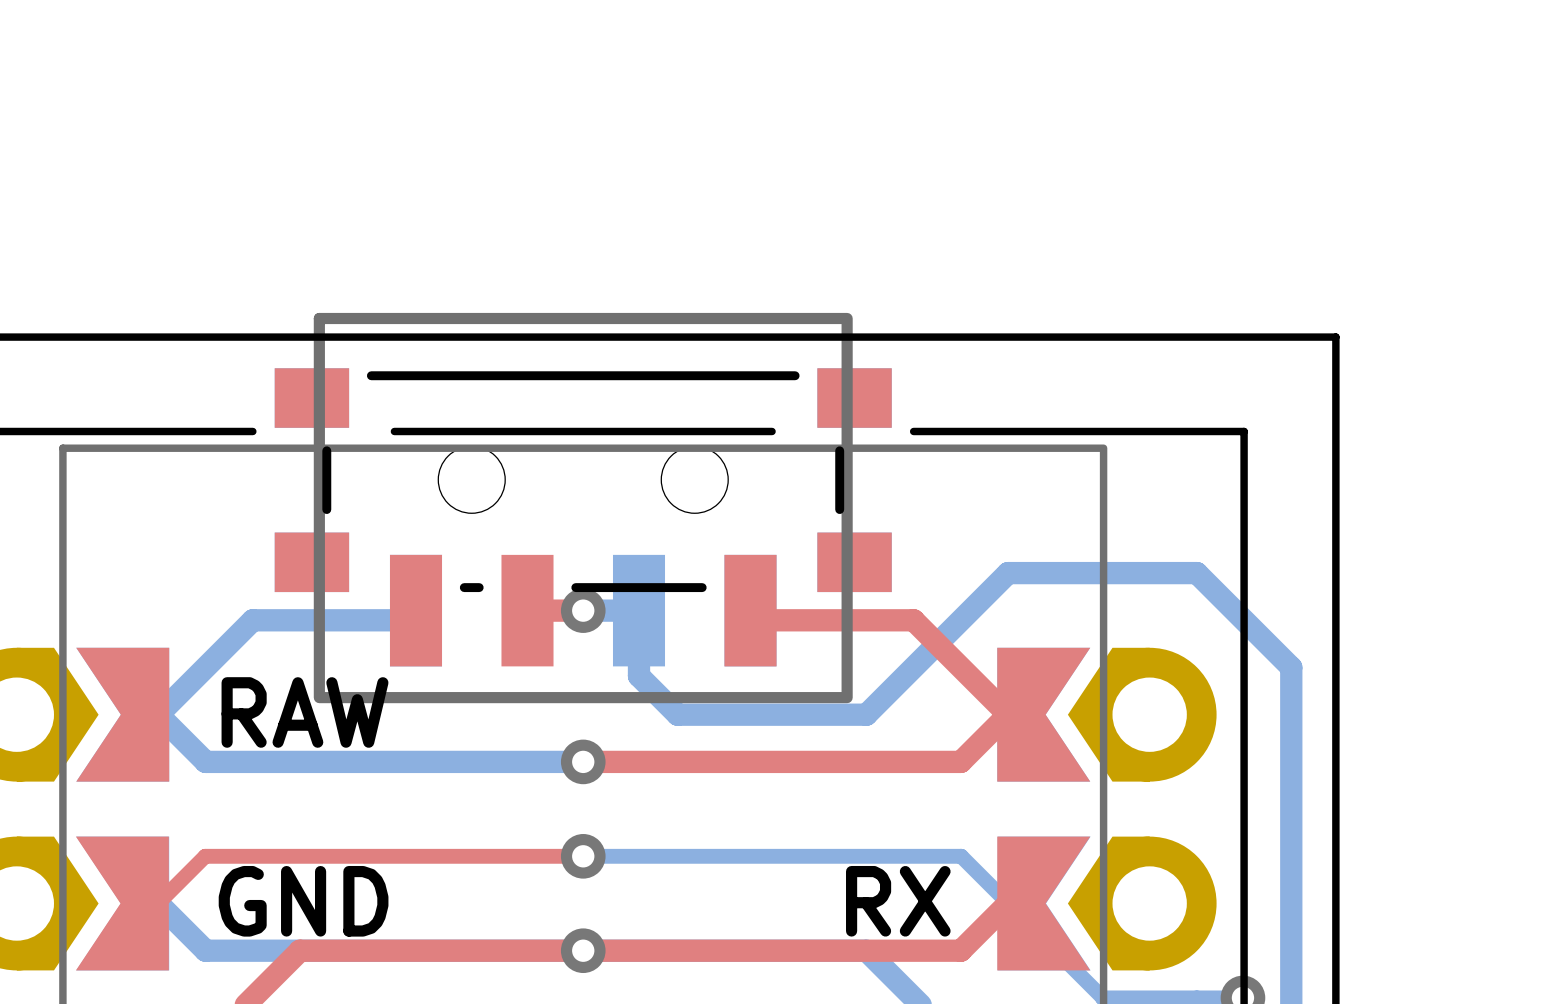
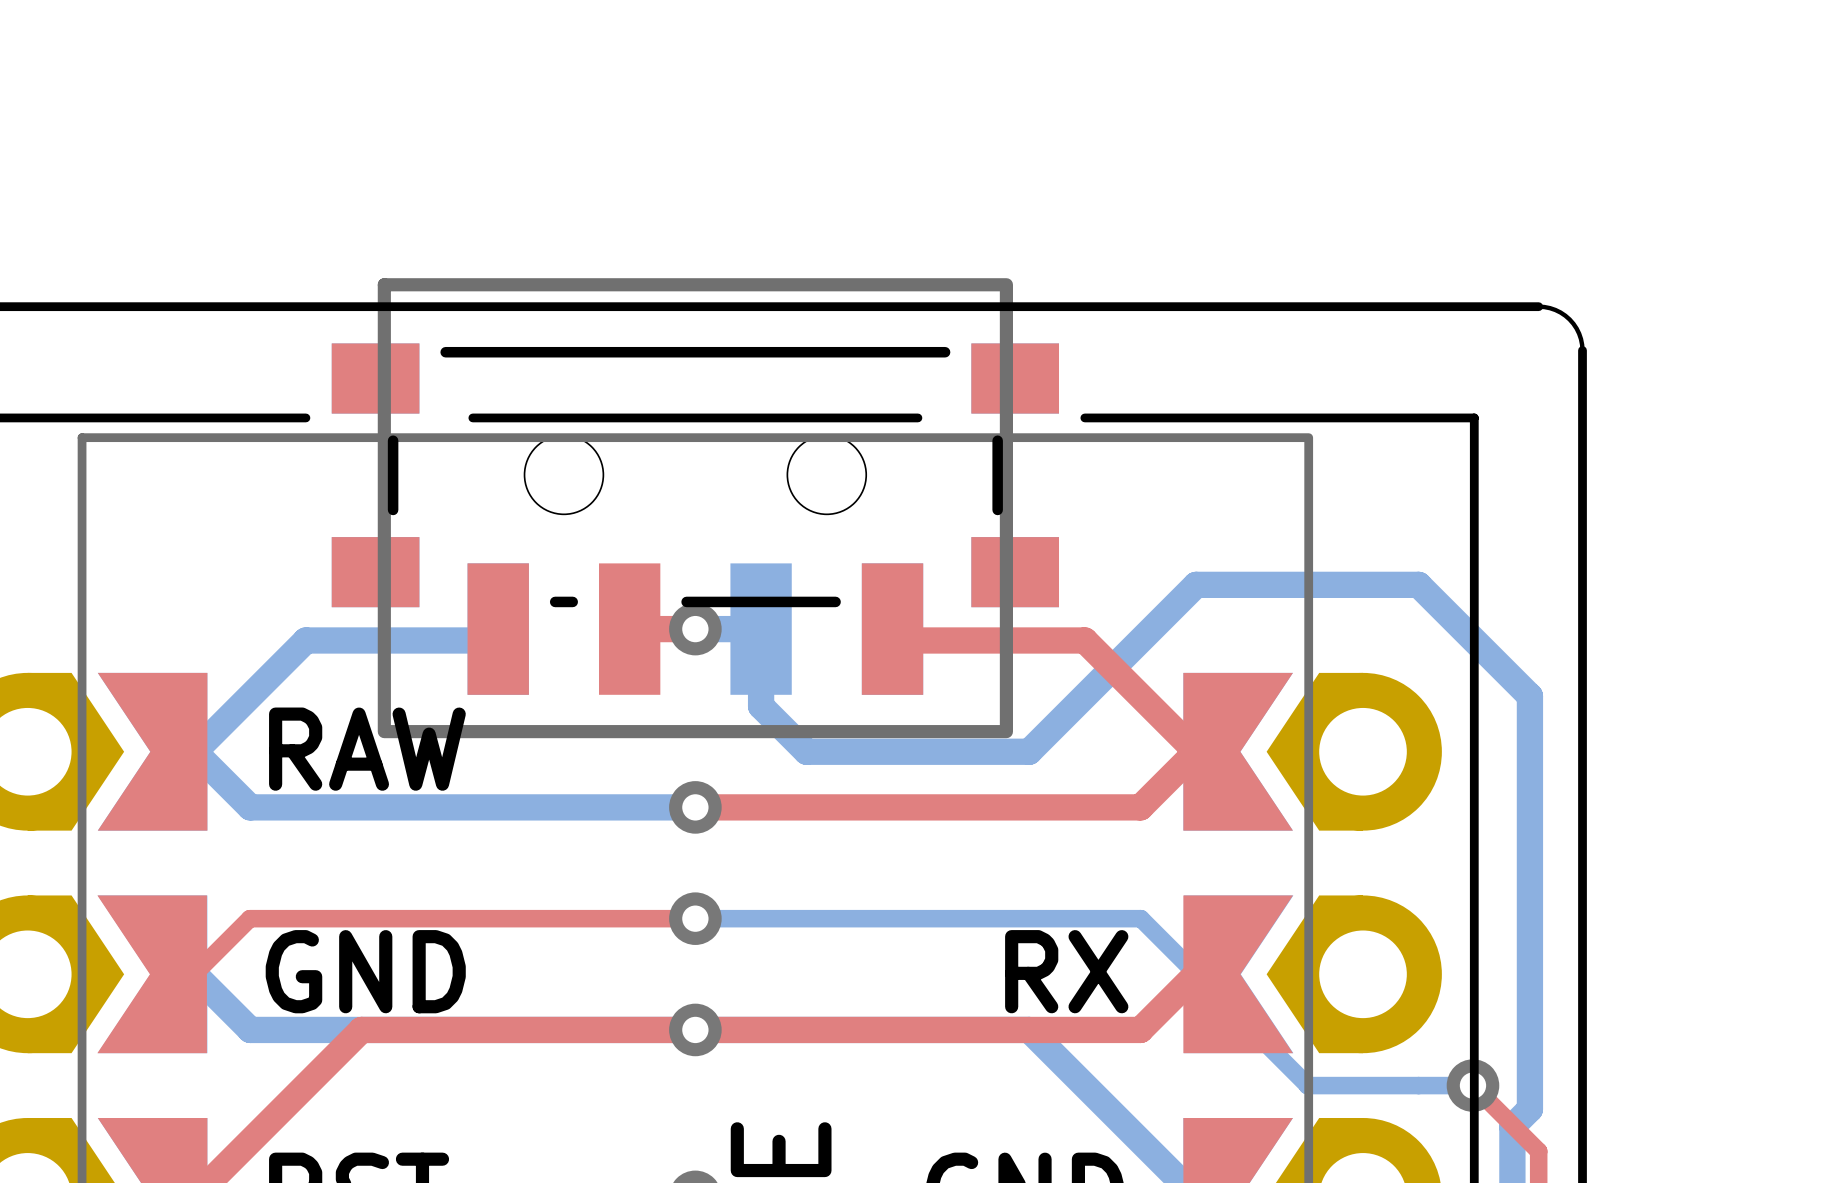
board edge: (1298, 337) (1335, 337) (1335, 374) -> (1538, 306) (1555, 310) (1569, 319) (1579, 333) (1582, 350)

